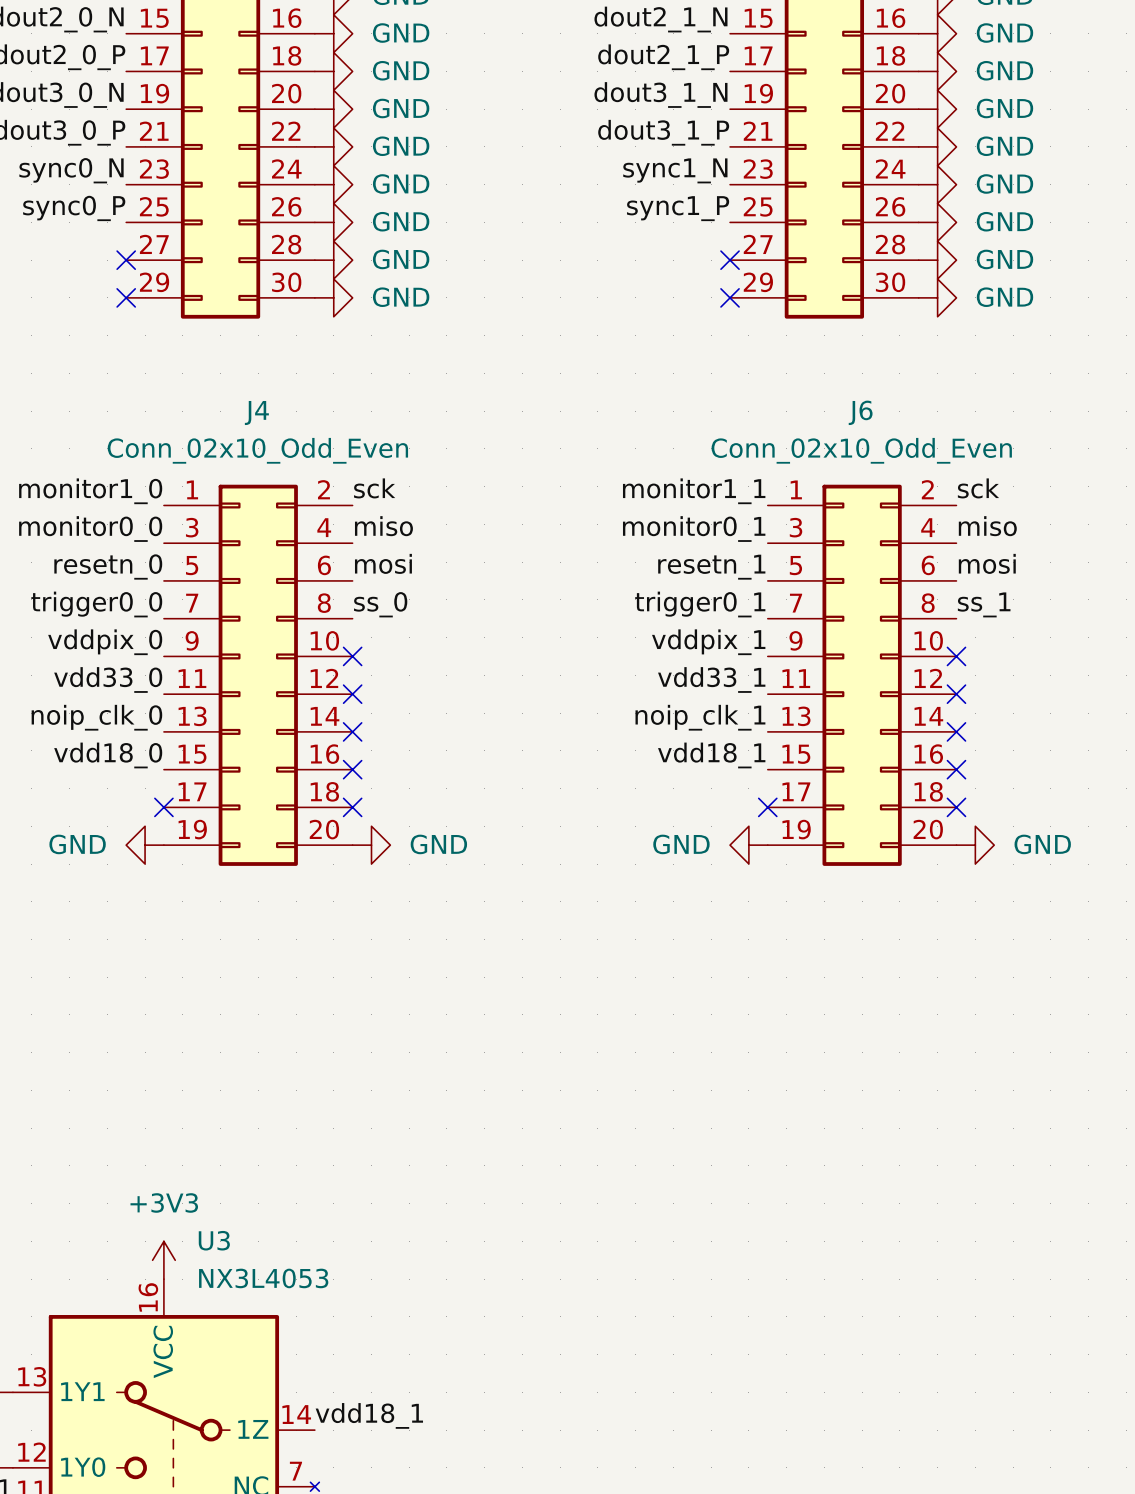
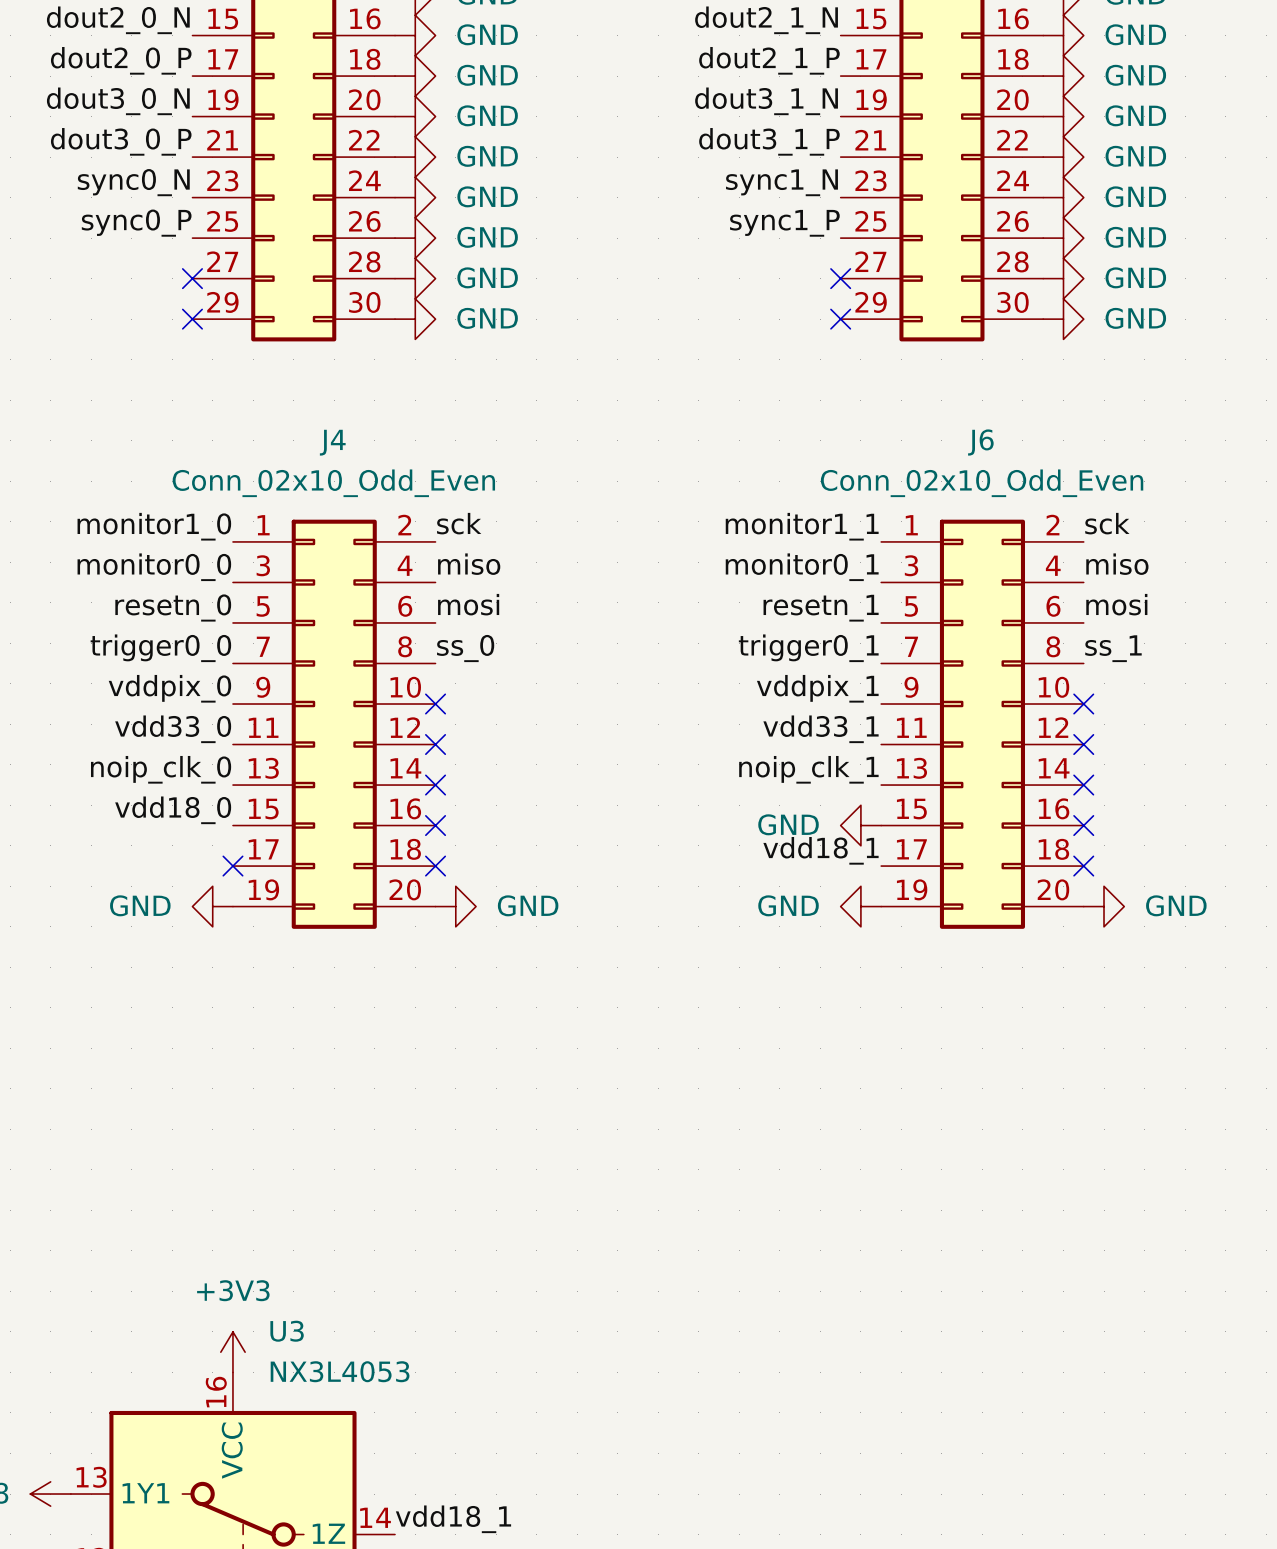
label position: vdd18_1 (711, 755) -> vdd18_1 (820, 850)
power symbol: none -> GND (860, 825)
no-connect mark: (767, 807) -> none

